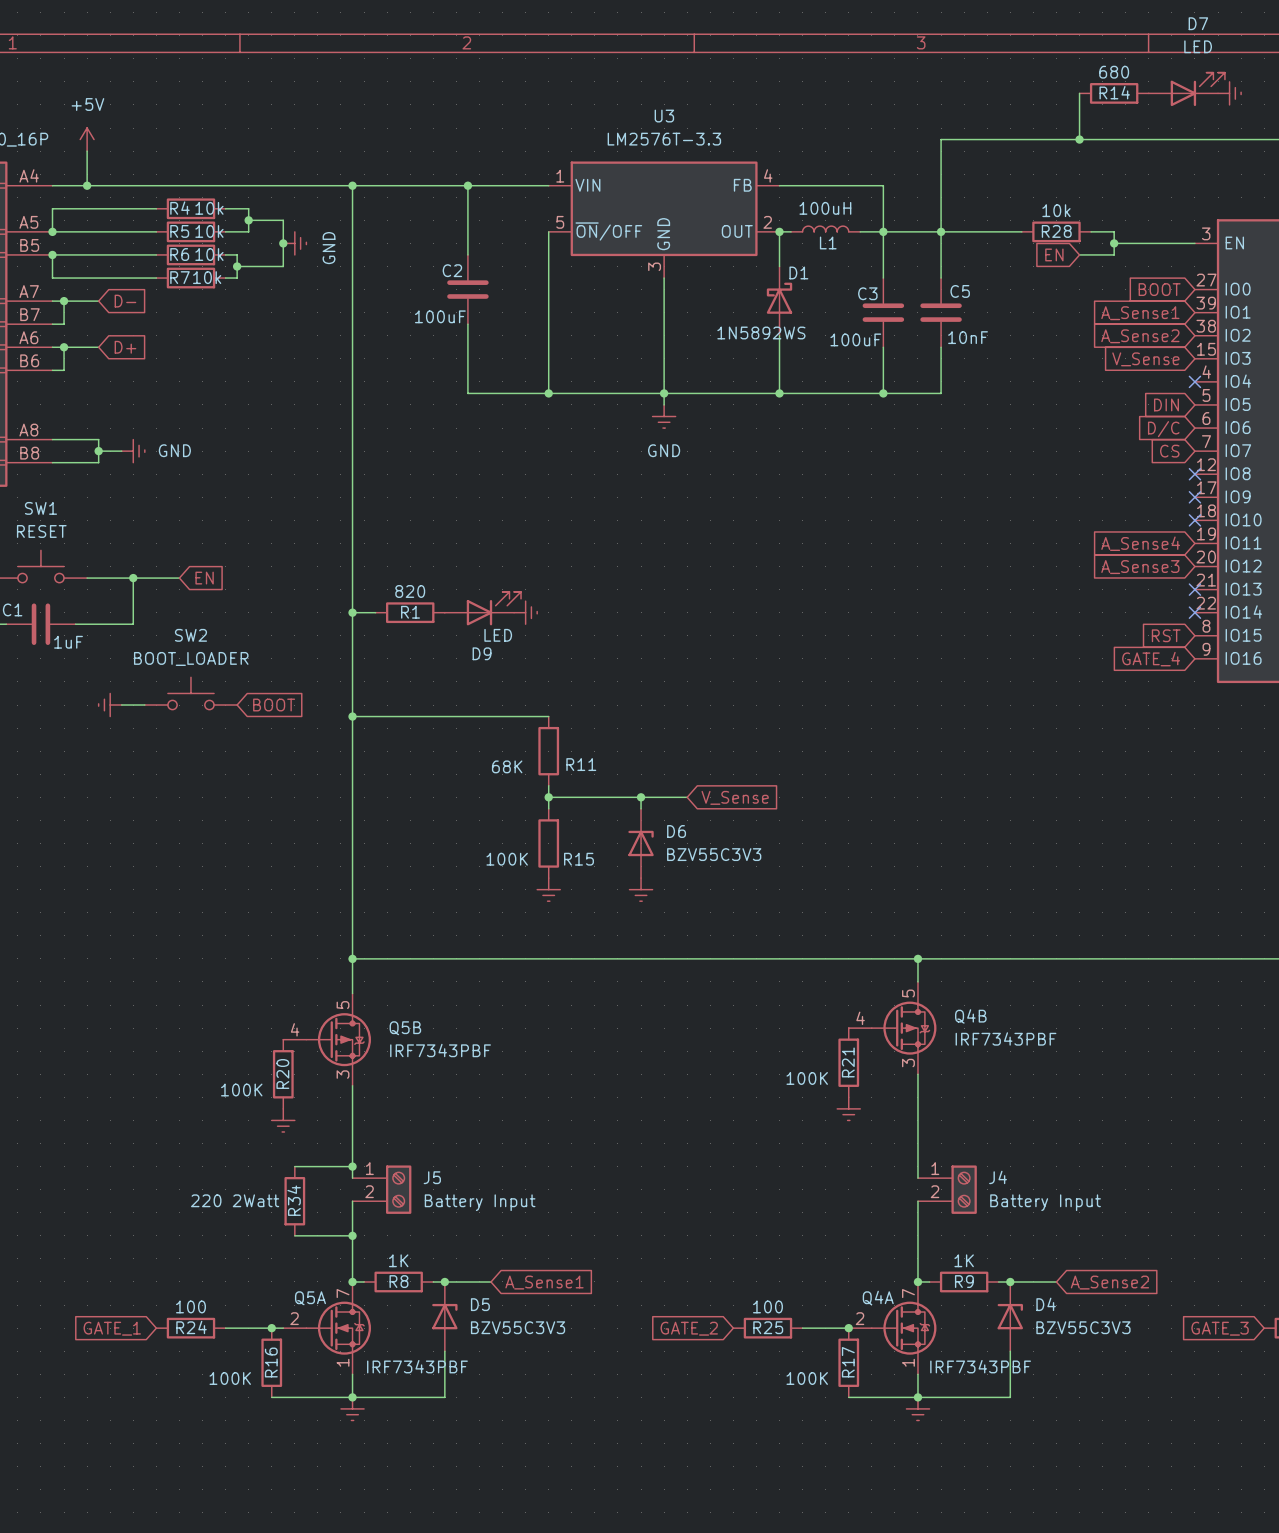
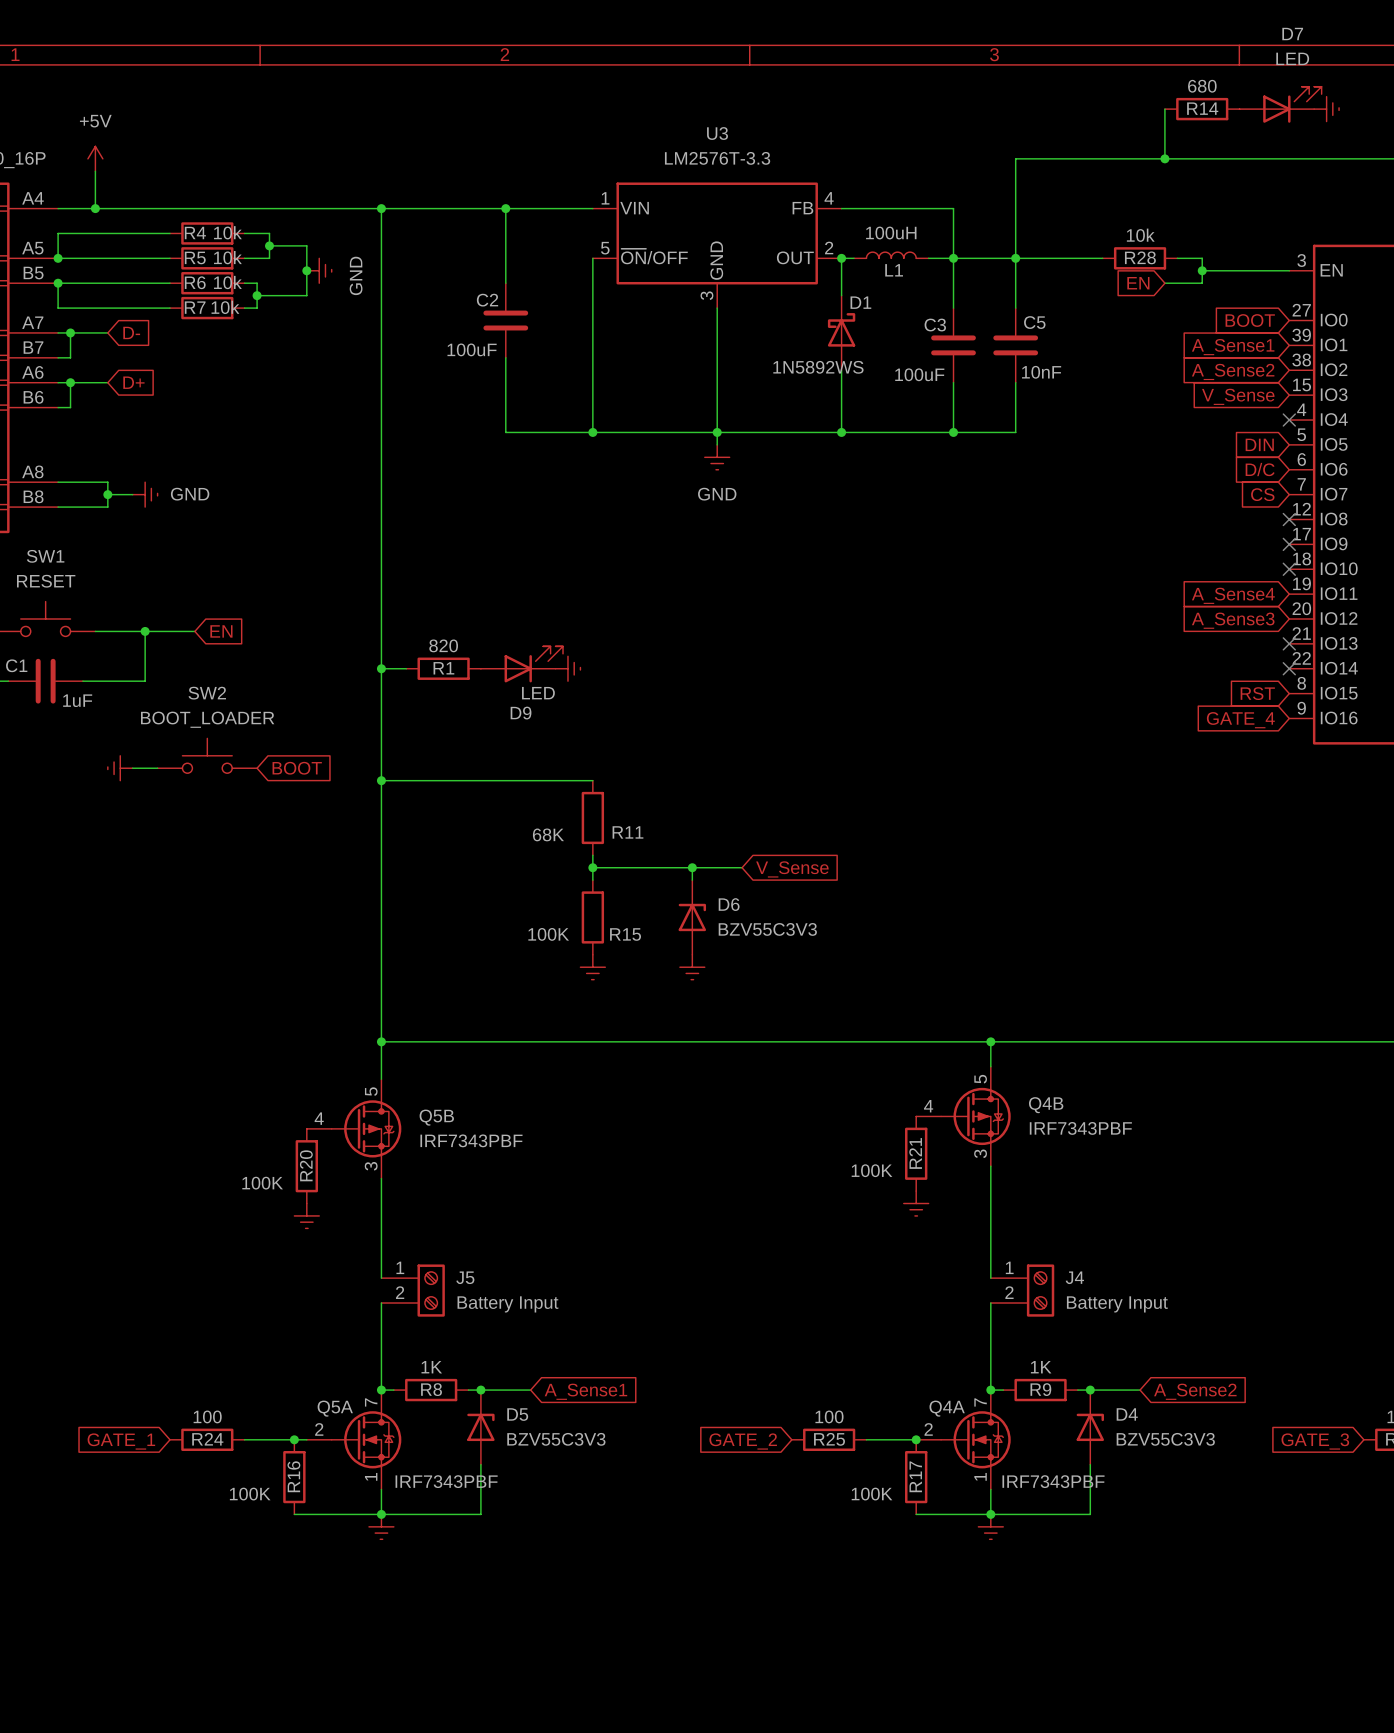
wire: (294, 1166) (352, 1166) -> none
junction: (352, 1166) -> none
R34: 220 2Watt (294, 1201) -> none
wire: (294, 1235) (352, 1235) -> none
junction: (352, 1235) -> none

